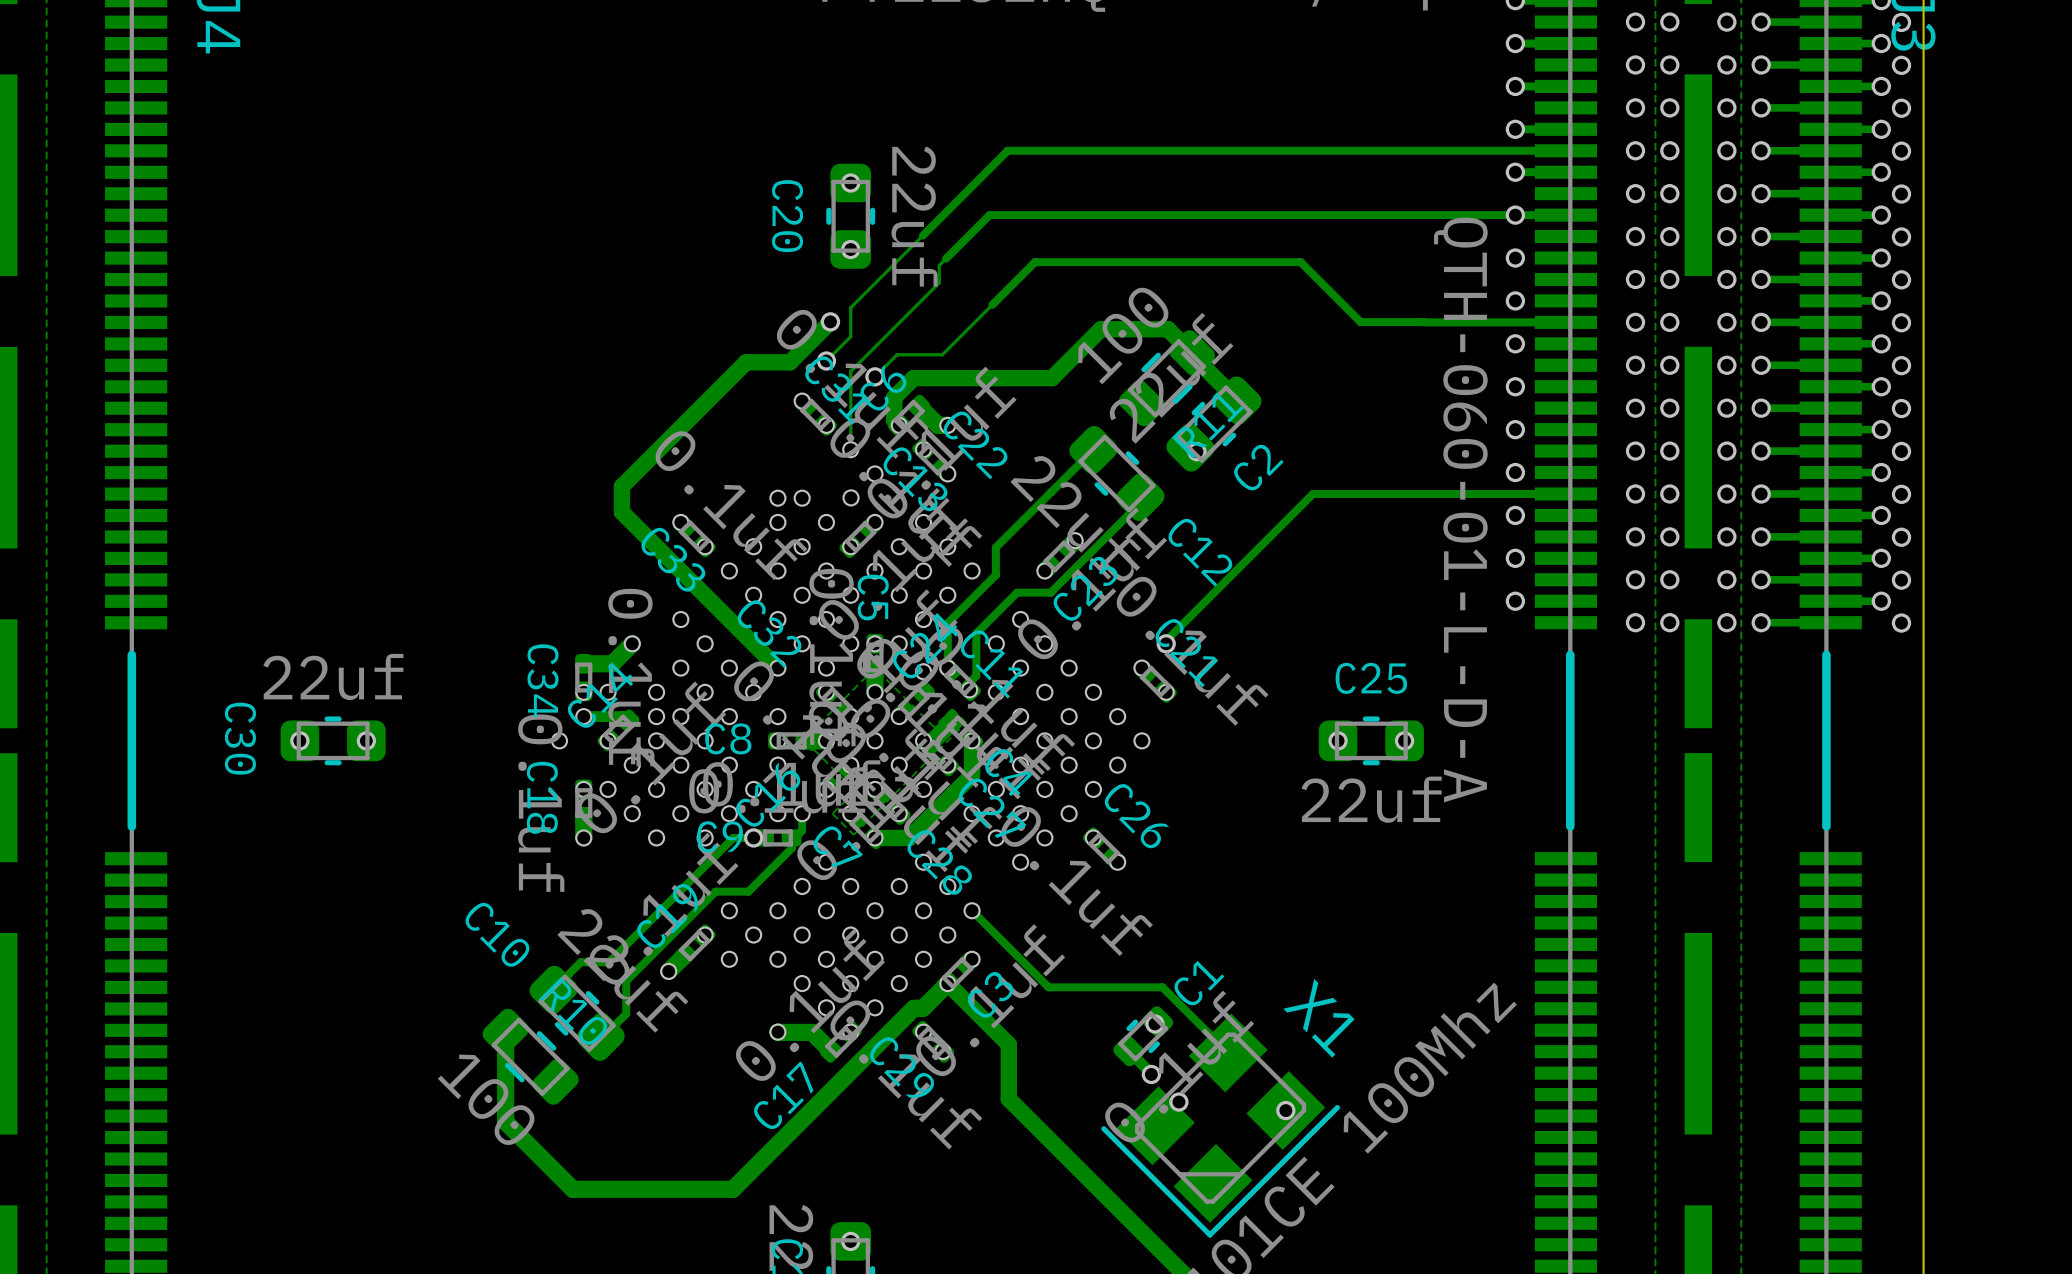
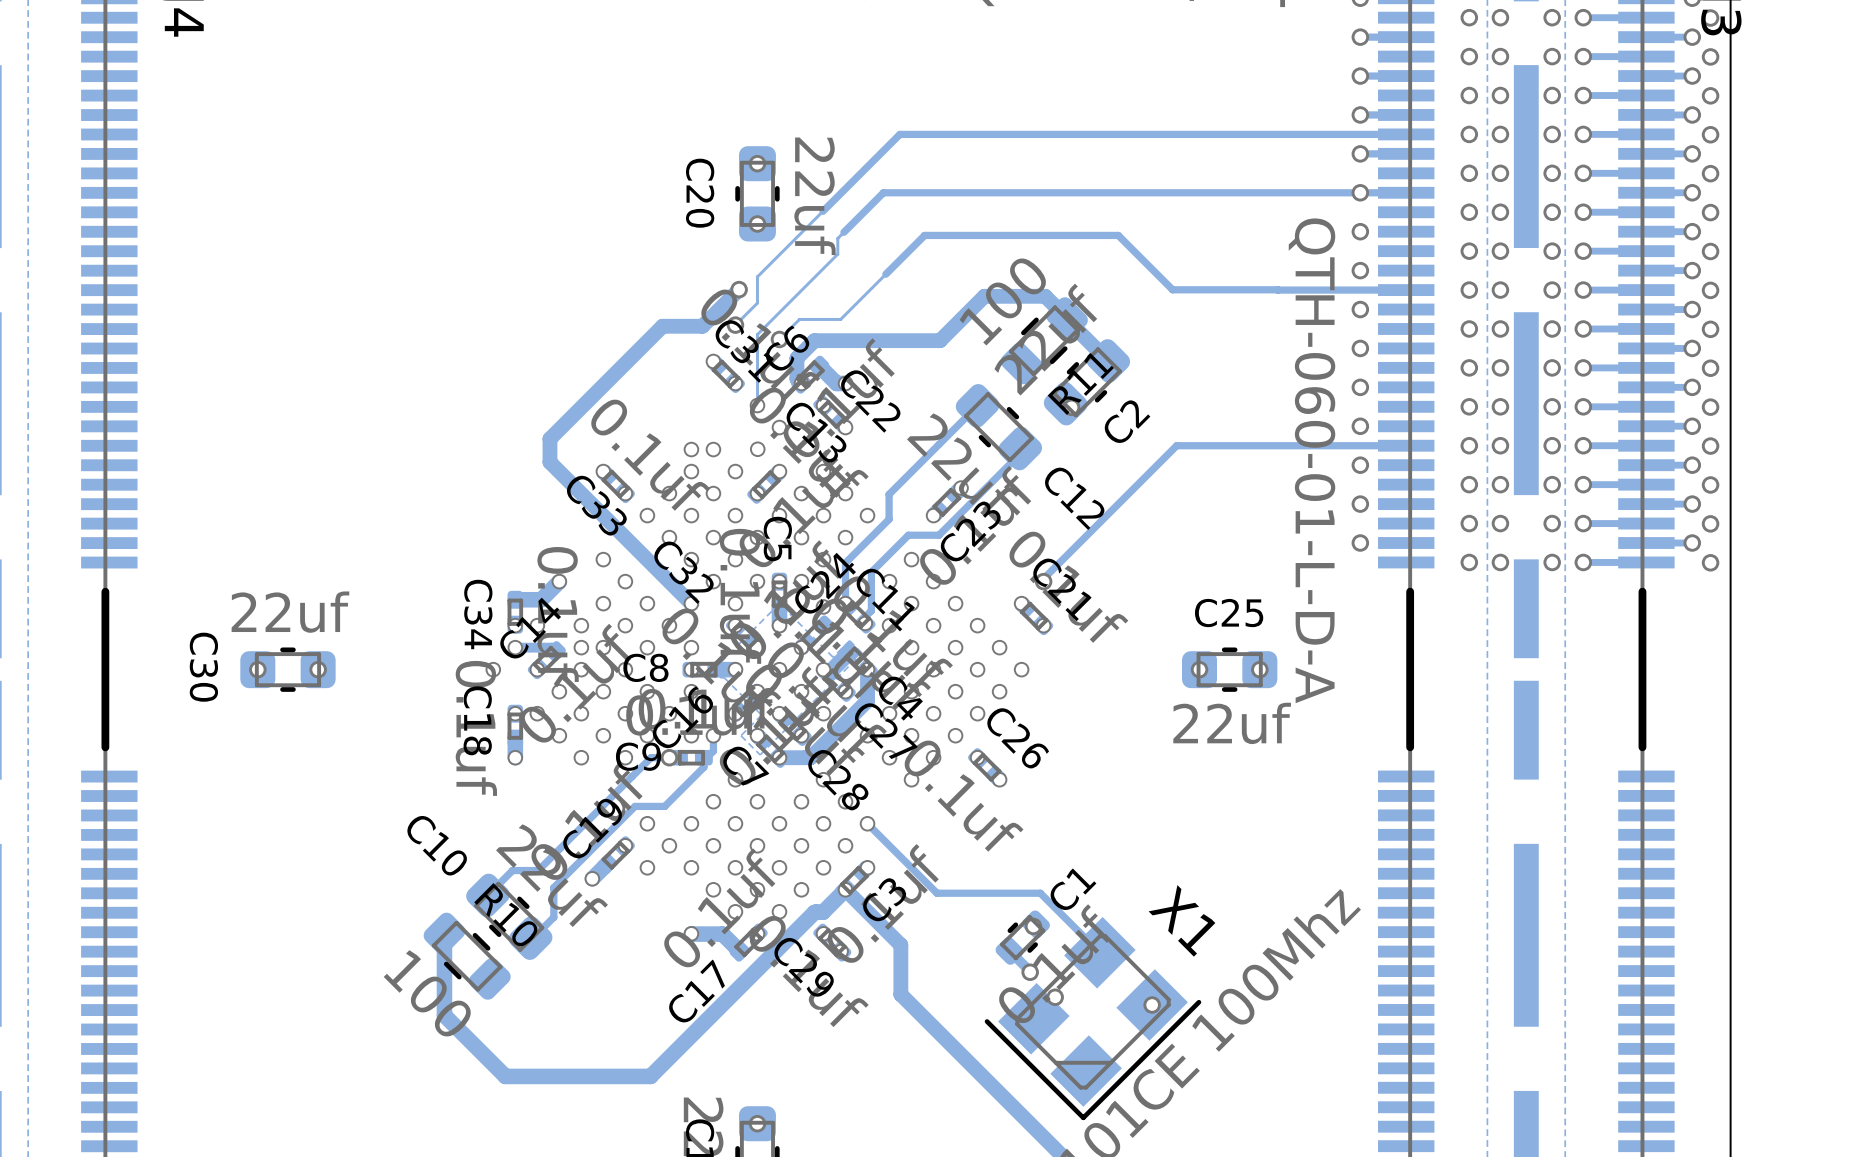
track: (1248, 262) (1300, 262) (1360, 322) -> (1118, 235) (1172, 289) (1219, 289)

